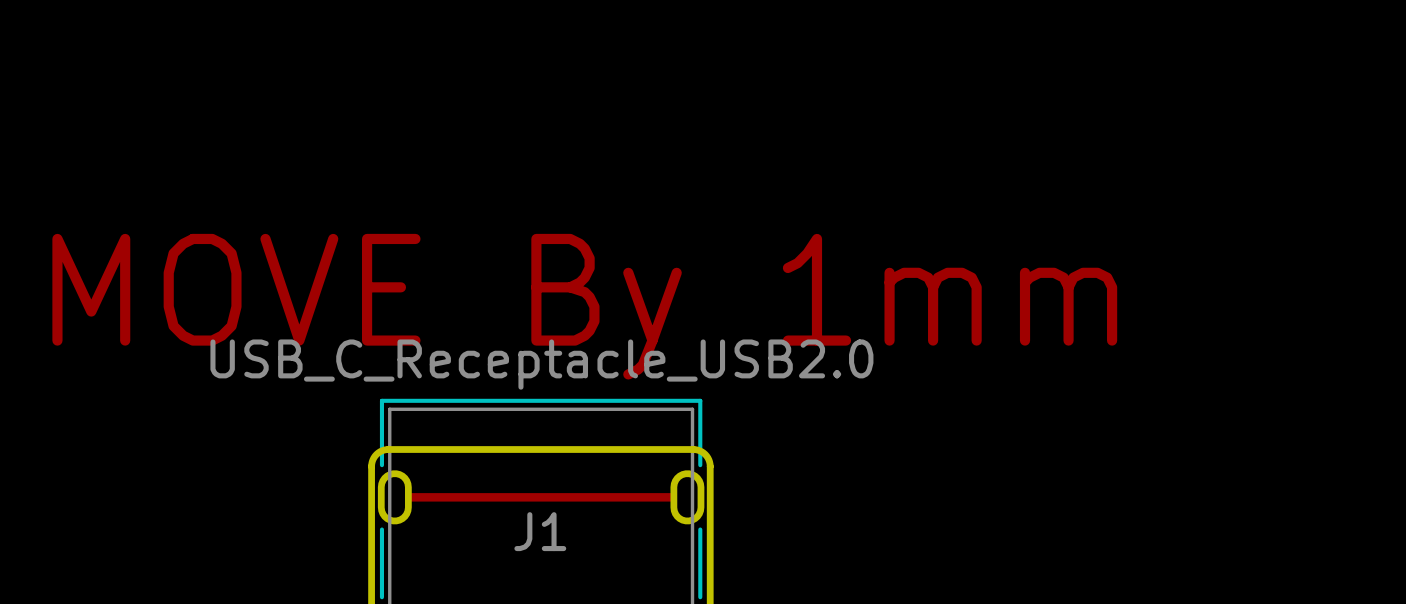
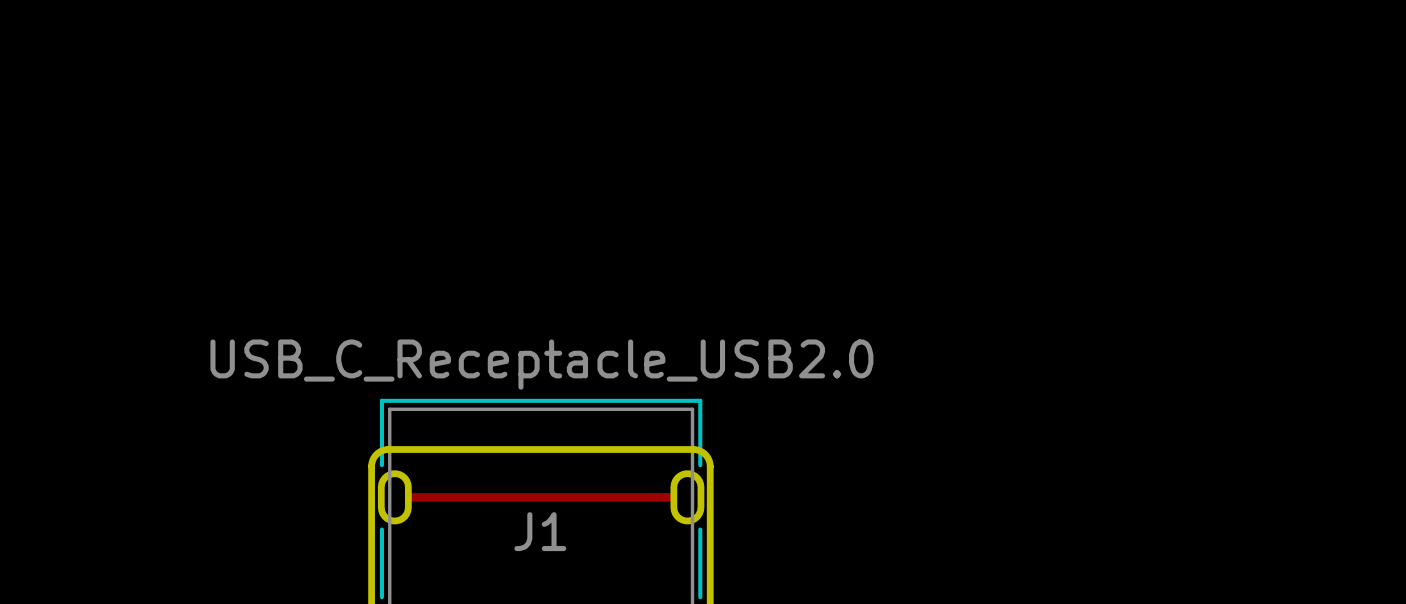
text: MOVE By 1mm (584, 306) -> none

